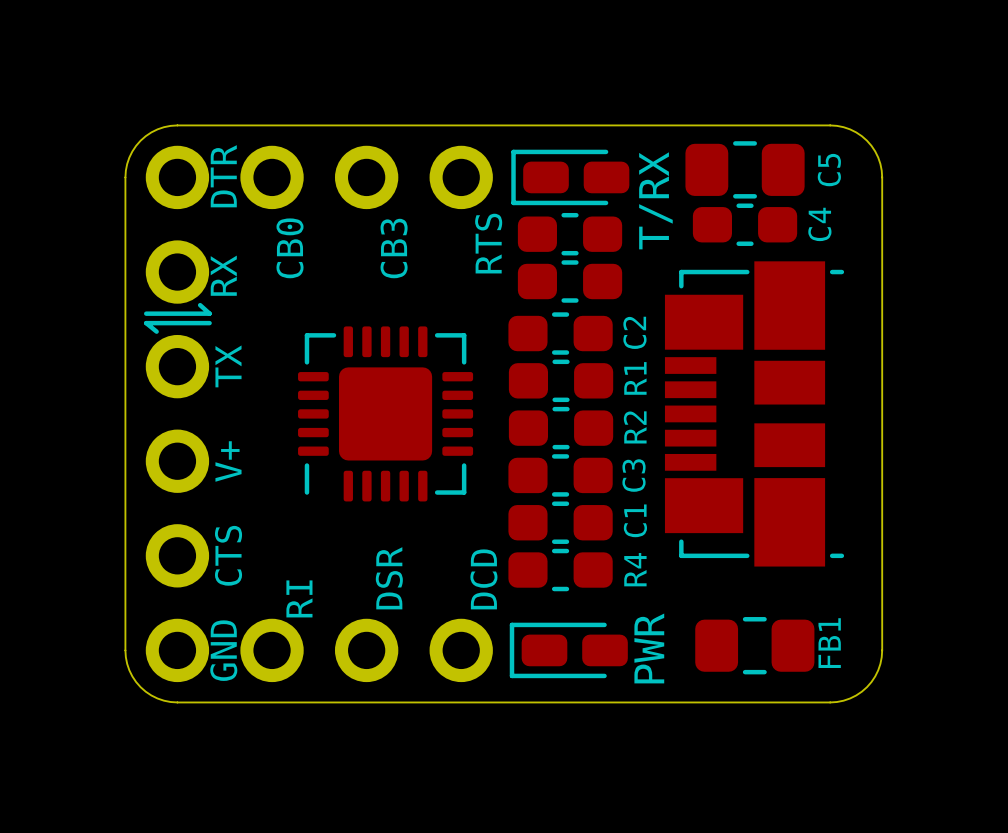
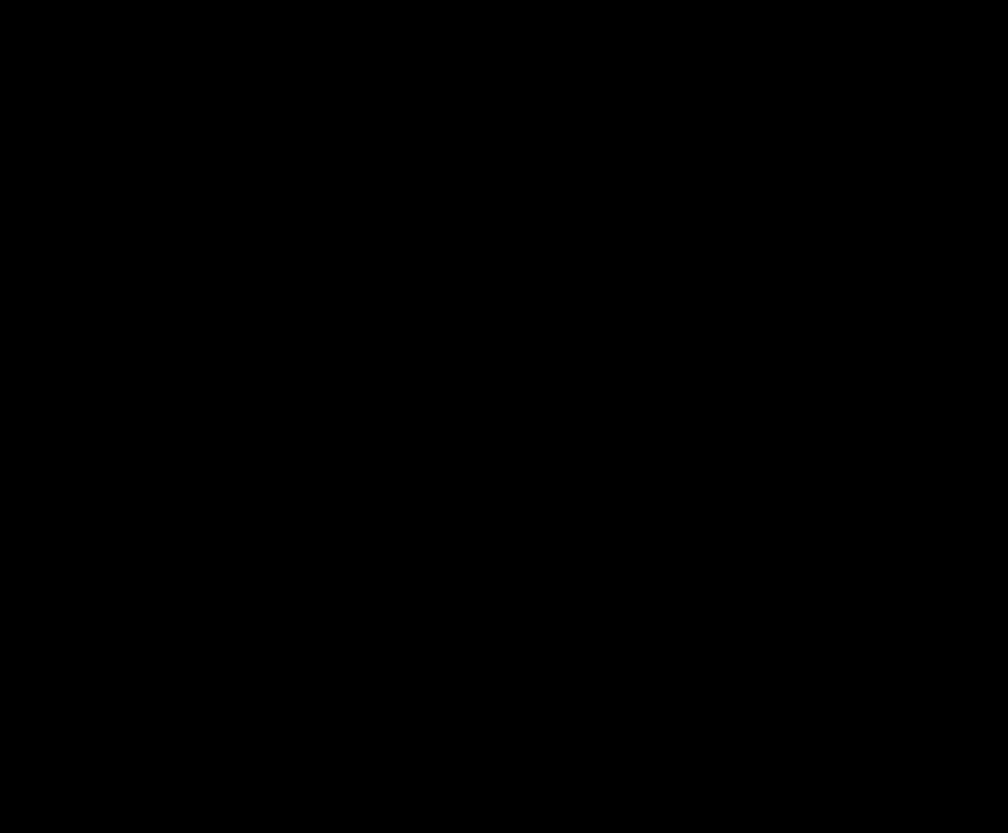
board edge: (177, 125) (830, 125) (850, 129) (861, 136) (871, 145) (878, 157) (882, 177) (882, 650) (878, 670) (871, 682) (861, 691) (850, 698) (830, 702) (177, 702) (157, 698) (145, 691) (136, 682) (129, 670) (125, 650) (125, 177) (129, 157) (140, 140) (157, 129) (177, 125) -> none
C5: (745, 169) -> none
text: DTR (223, 176) -> none
part: (366, 177) -> none
T/RX: (570, 177) -> none
C4: (745, 224) -> none
part: (570, 234) -> none
text: RTS (488, 243) -> none
text: CB0 (290, 248) -> none
text: CB3 (394, 248) -> none
text: RX (223, 275) -> none
part: (570, 281) -> none
line: (200, 305) (209, 313) (146, 313) -> none
line: (209, 323) (146, 323) (156, 331) -> none
C2: (560, 333) -> none
text: TX (228, 366) -> none
R1: (561, 380) -> none
part: (177, 413) -> none
part: (385, 413) -> none
part: (754, 413) -> none
R2: (561, 428) -> none
text: V+ (228, 461) -> none
C3: (560, 475) -> none
C1: (560, 522) -> none
text: CTS (228, 555) -> none
R4: (560, 570) -> none
text: DSR (389, 578) -> none
text: DCD (483, 579) -> none
text: RI (299, 598) -> none
FB1: (754, 645) -> none
text: GND (223, 650) -> none
part: (366, 650) -> none
PWR: (568, 650) -> none

